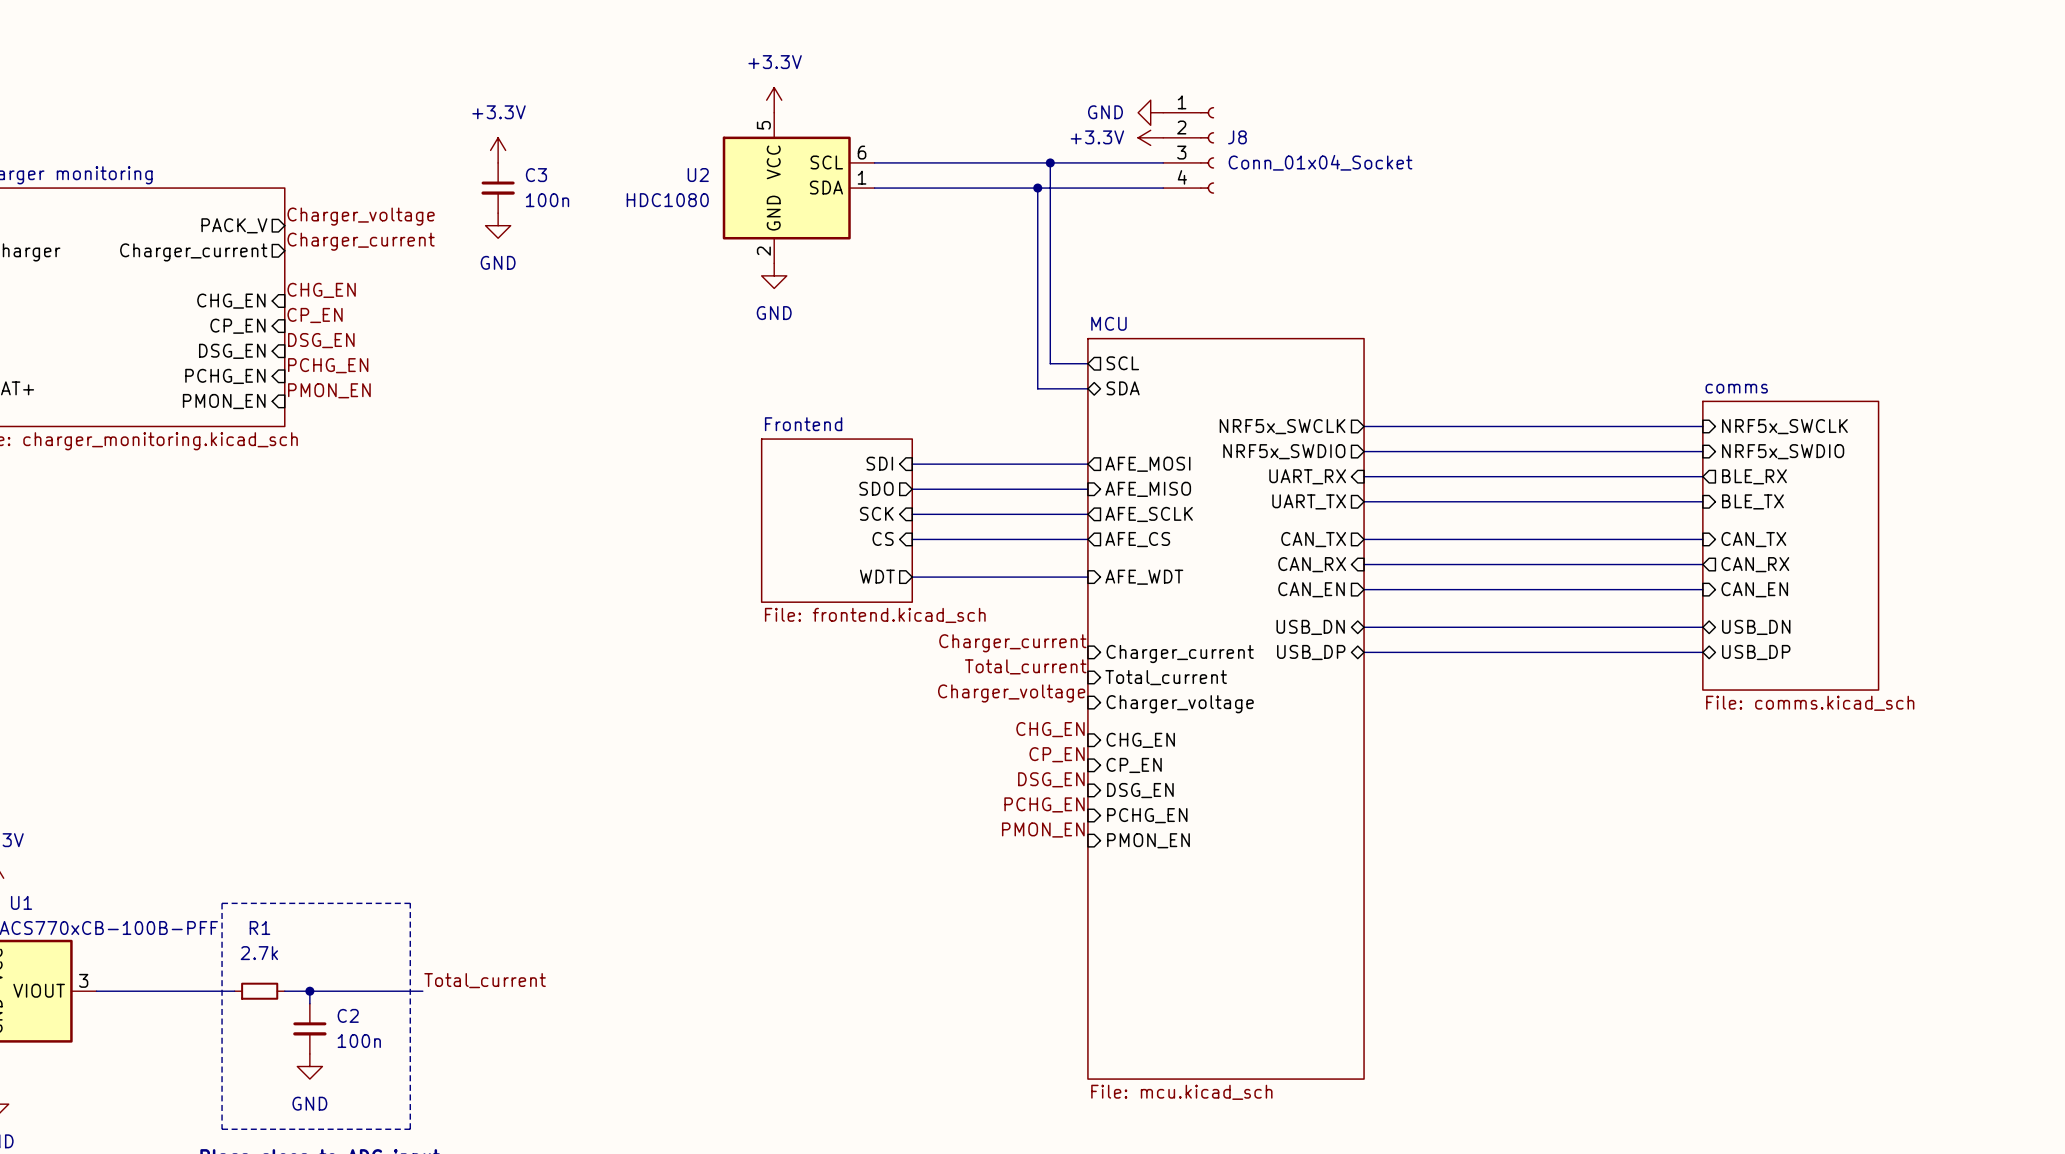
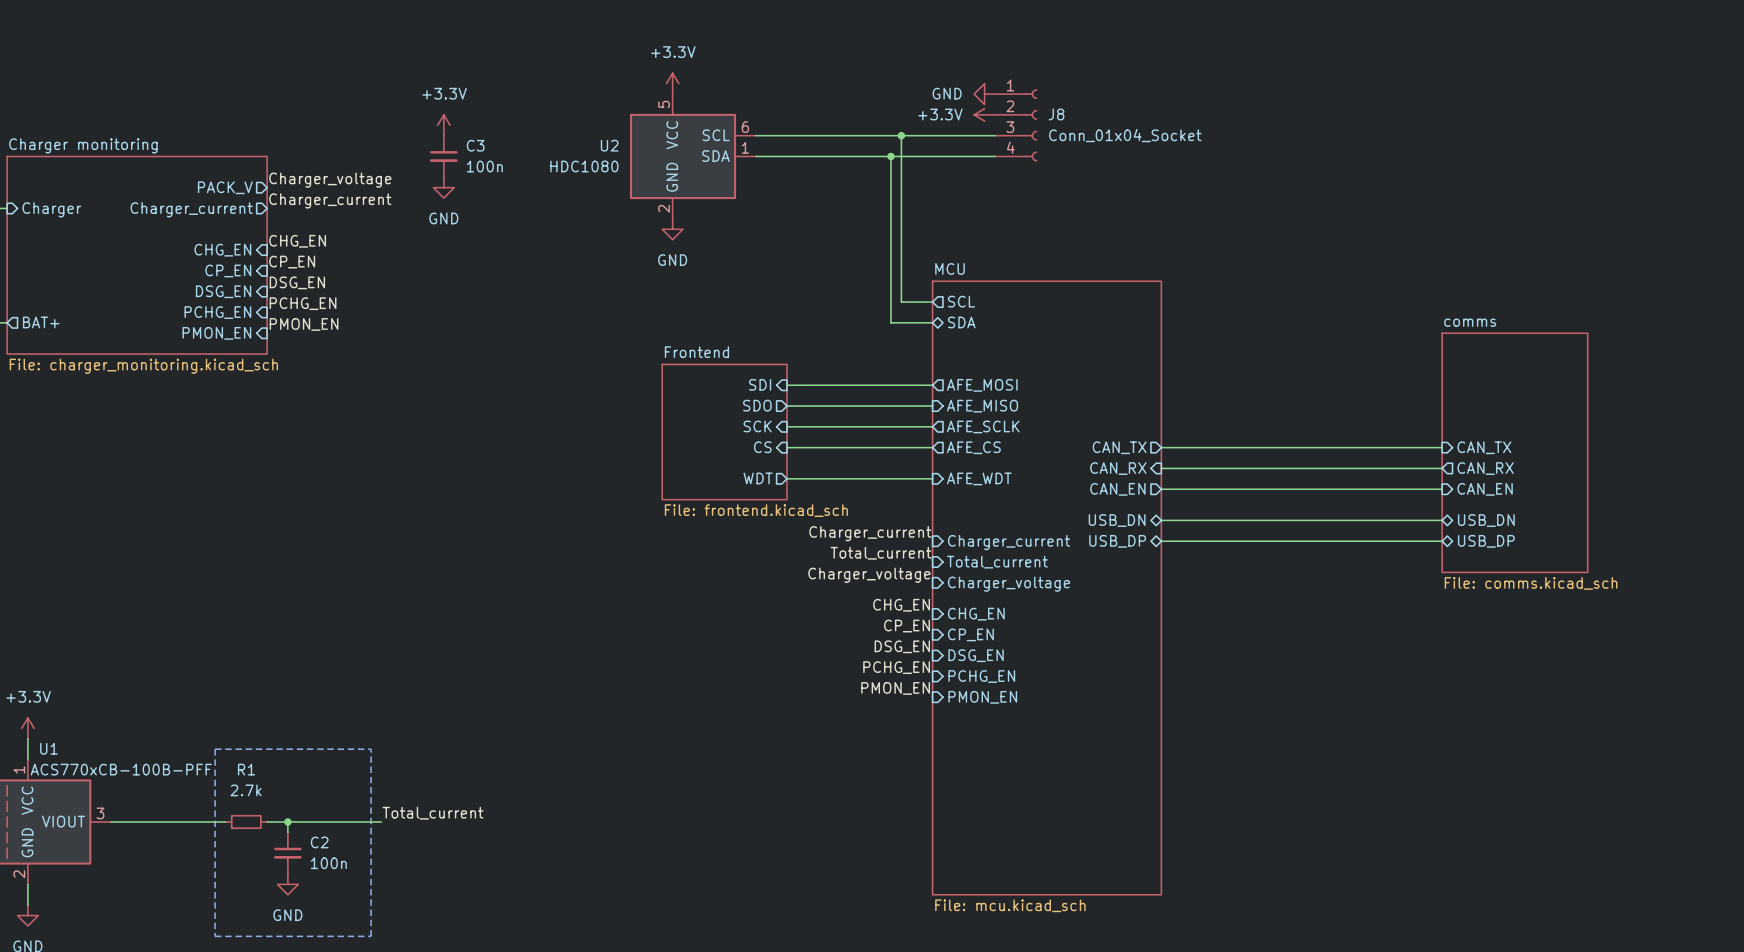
sheet pin: NRF5x_SWCLK (1282, 426) -> none
wire: (1364, 426) (1702, 426) -> none
sheet pin: NRF5x_SWCLK (1784, 426) -> none
sheet pin: NRF5x_SWDIO (1284, 451) -> none
wire: (1364, 451) (1702, 451) -> none
sheet pin: NRF5x_SWDIO (1783, 451) -> none
sheet pin: UART_RX (1307, 476) -> none
wire: (1364, 476) (1702, 476) -> none
sheet pin: BLE_RX (1754, 476) -> none
sheet pin: UART_TX (1309, 501) -> none
wire: (1364, 501) (1702, 501) -> none
sheet pin: BLE_TX (1752, 501) -> none

